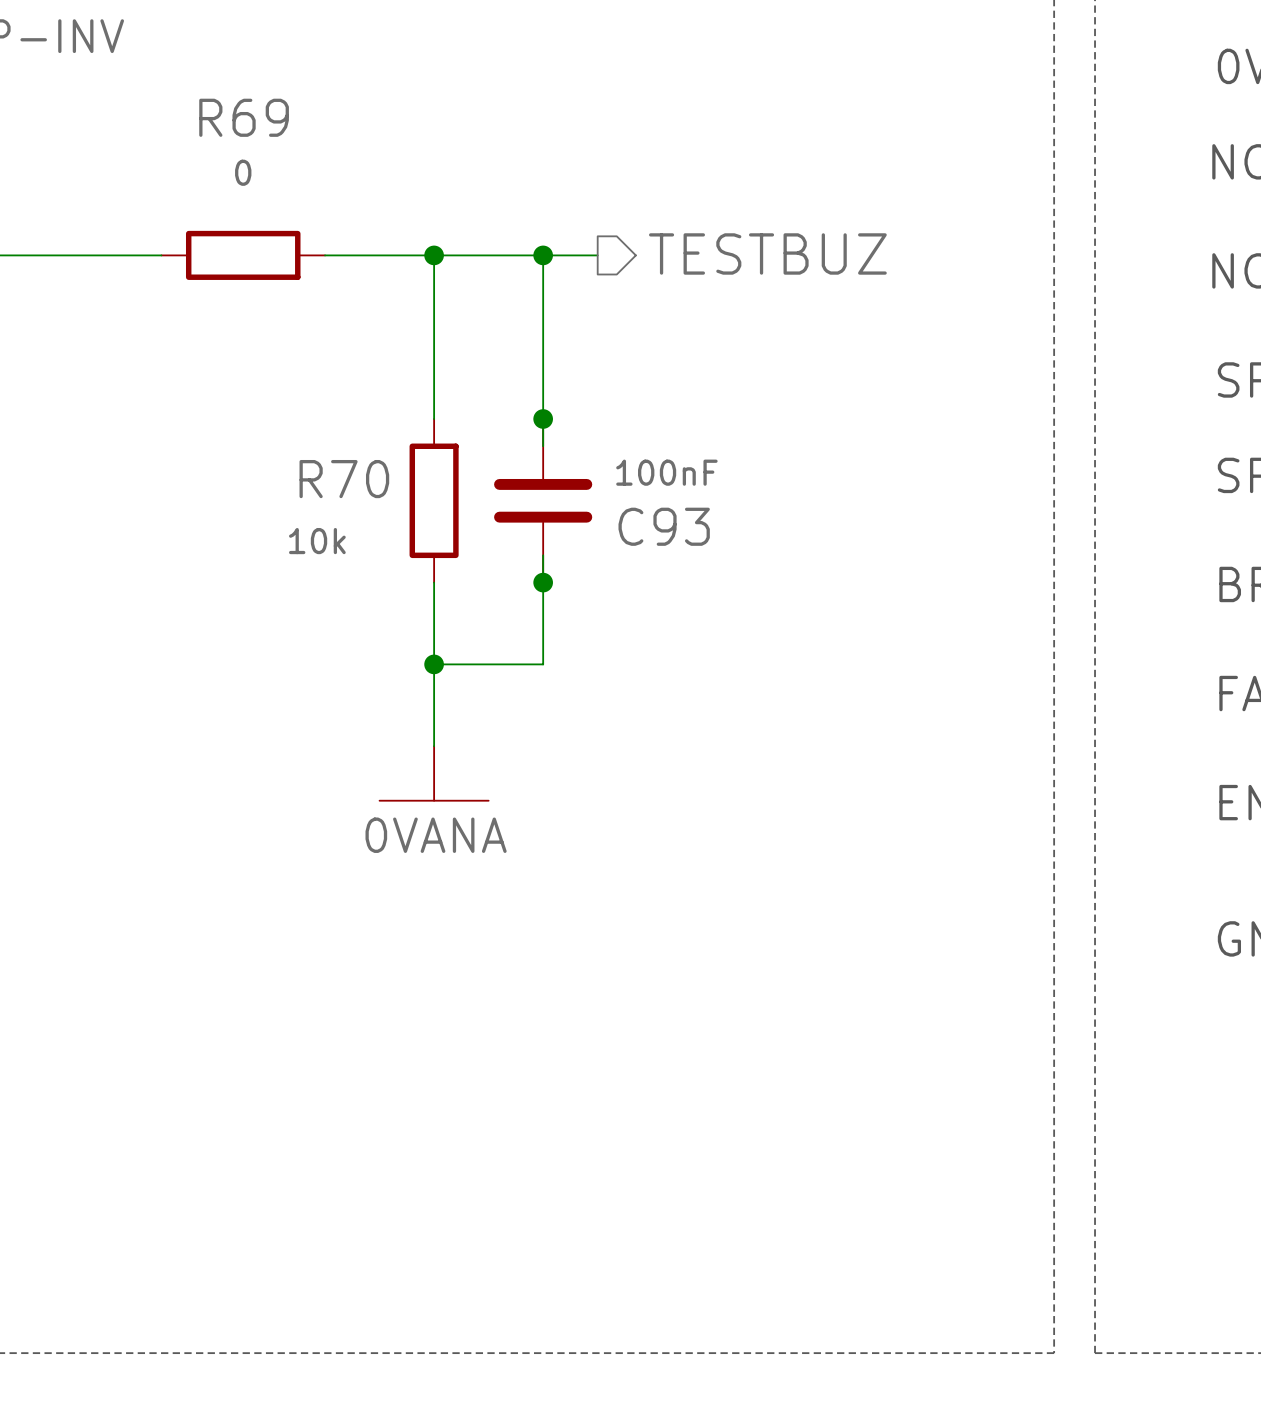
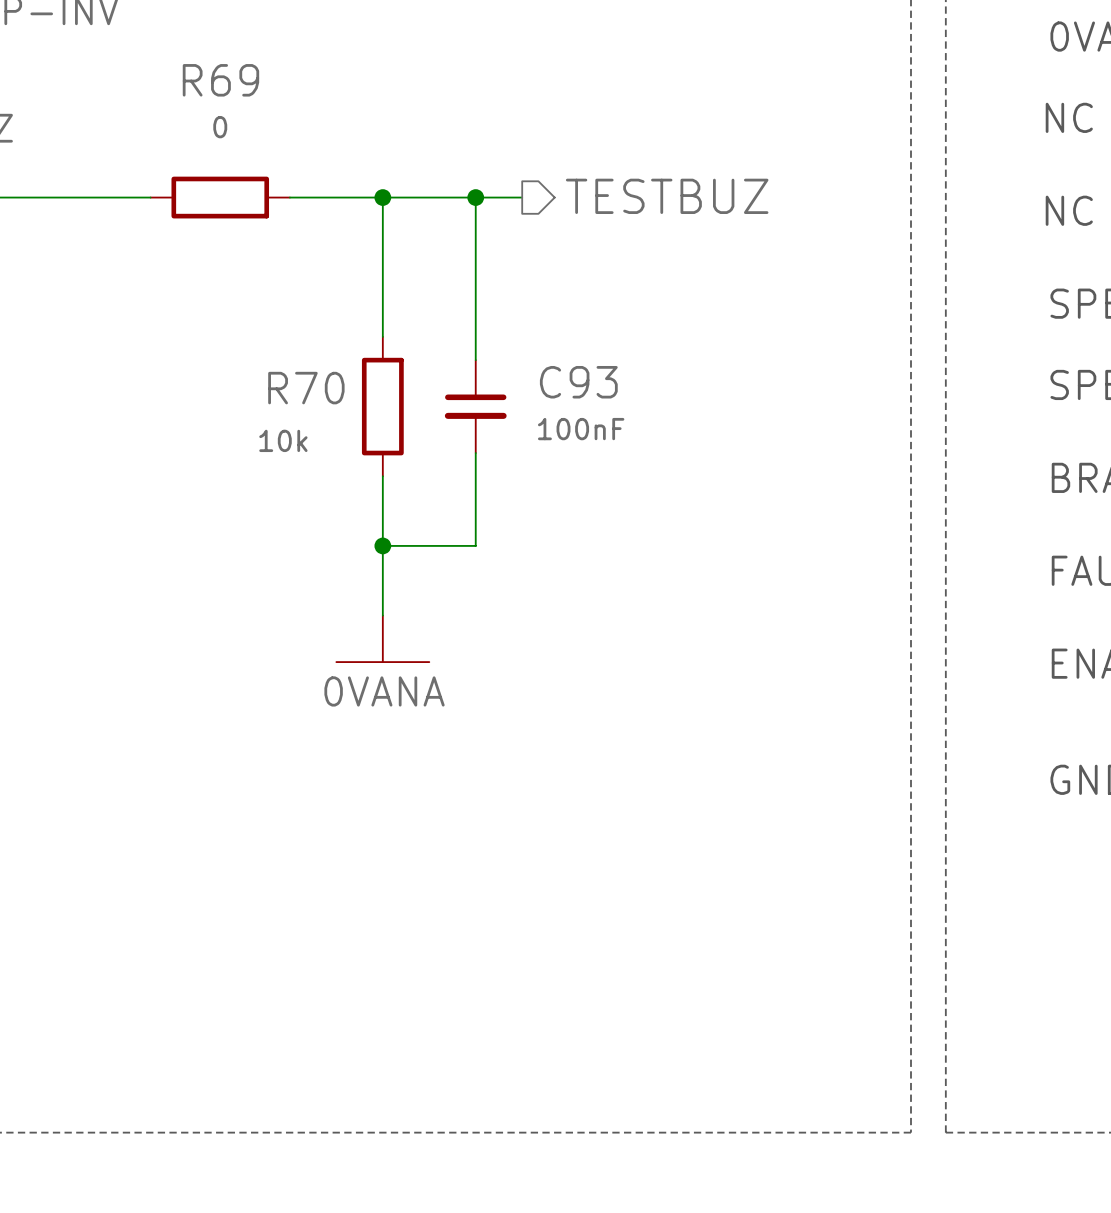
C93 symbol: [494, 419, 593, 583] -> [444, 360, 507, 454]
junction: (543, 419) -> none
C93 value position: 100nF (666, 472) -> 100nF (581, 429)
C93 name position: C93 (664, 526) -> C93 (578, 382)
junction: (543, 582) -> none

